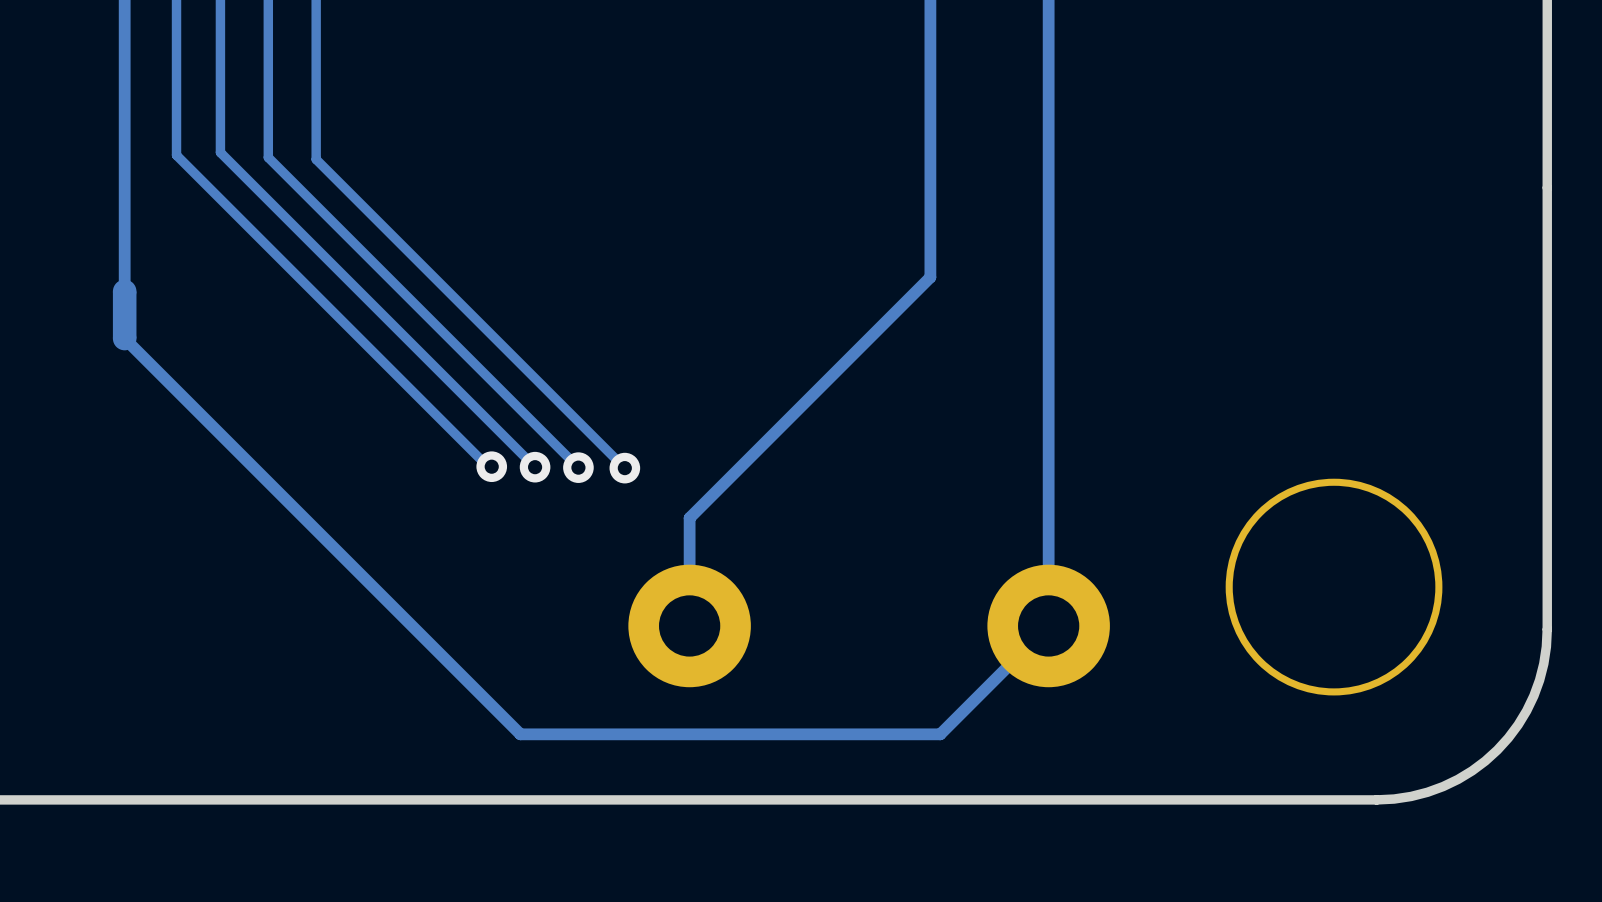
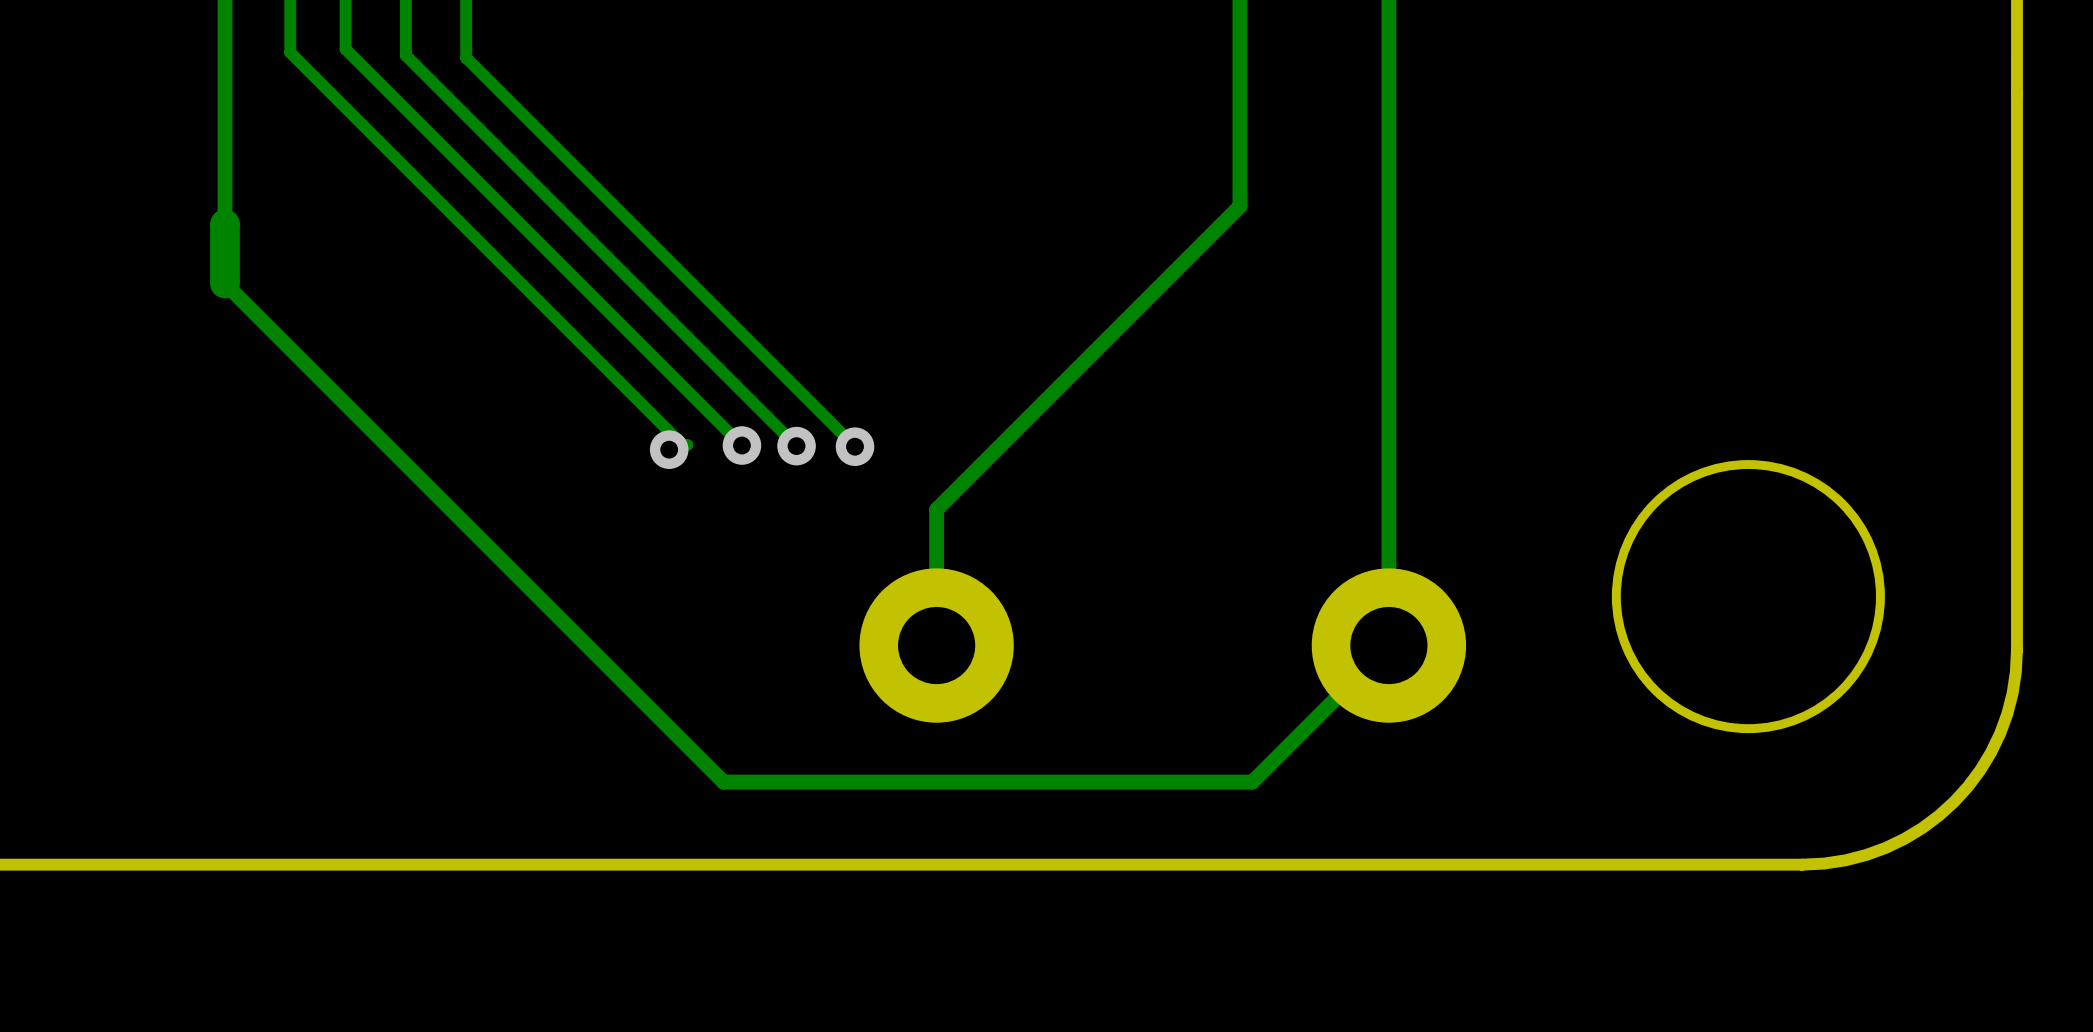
via position: (491, 466) -> (669, 449)

